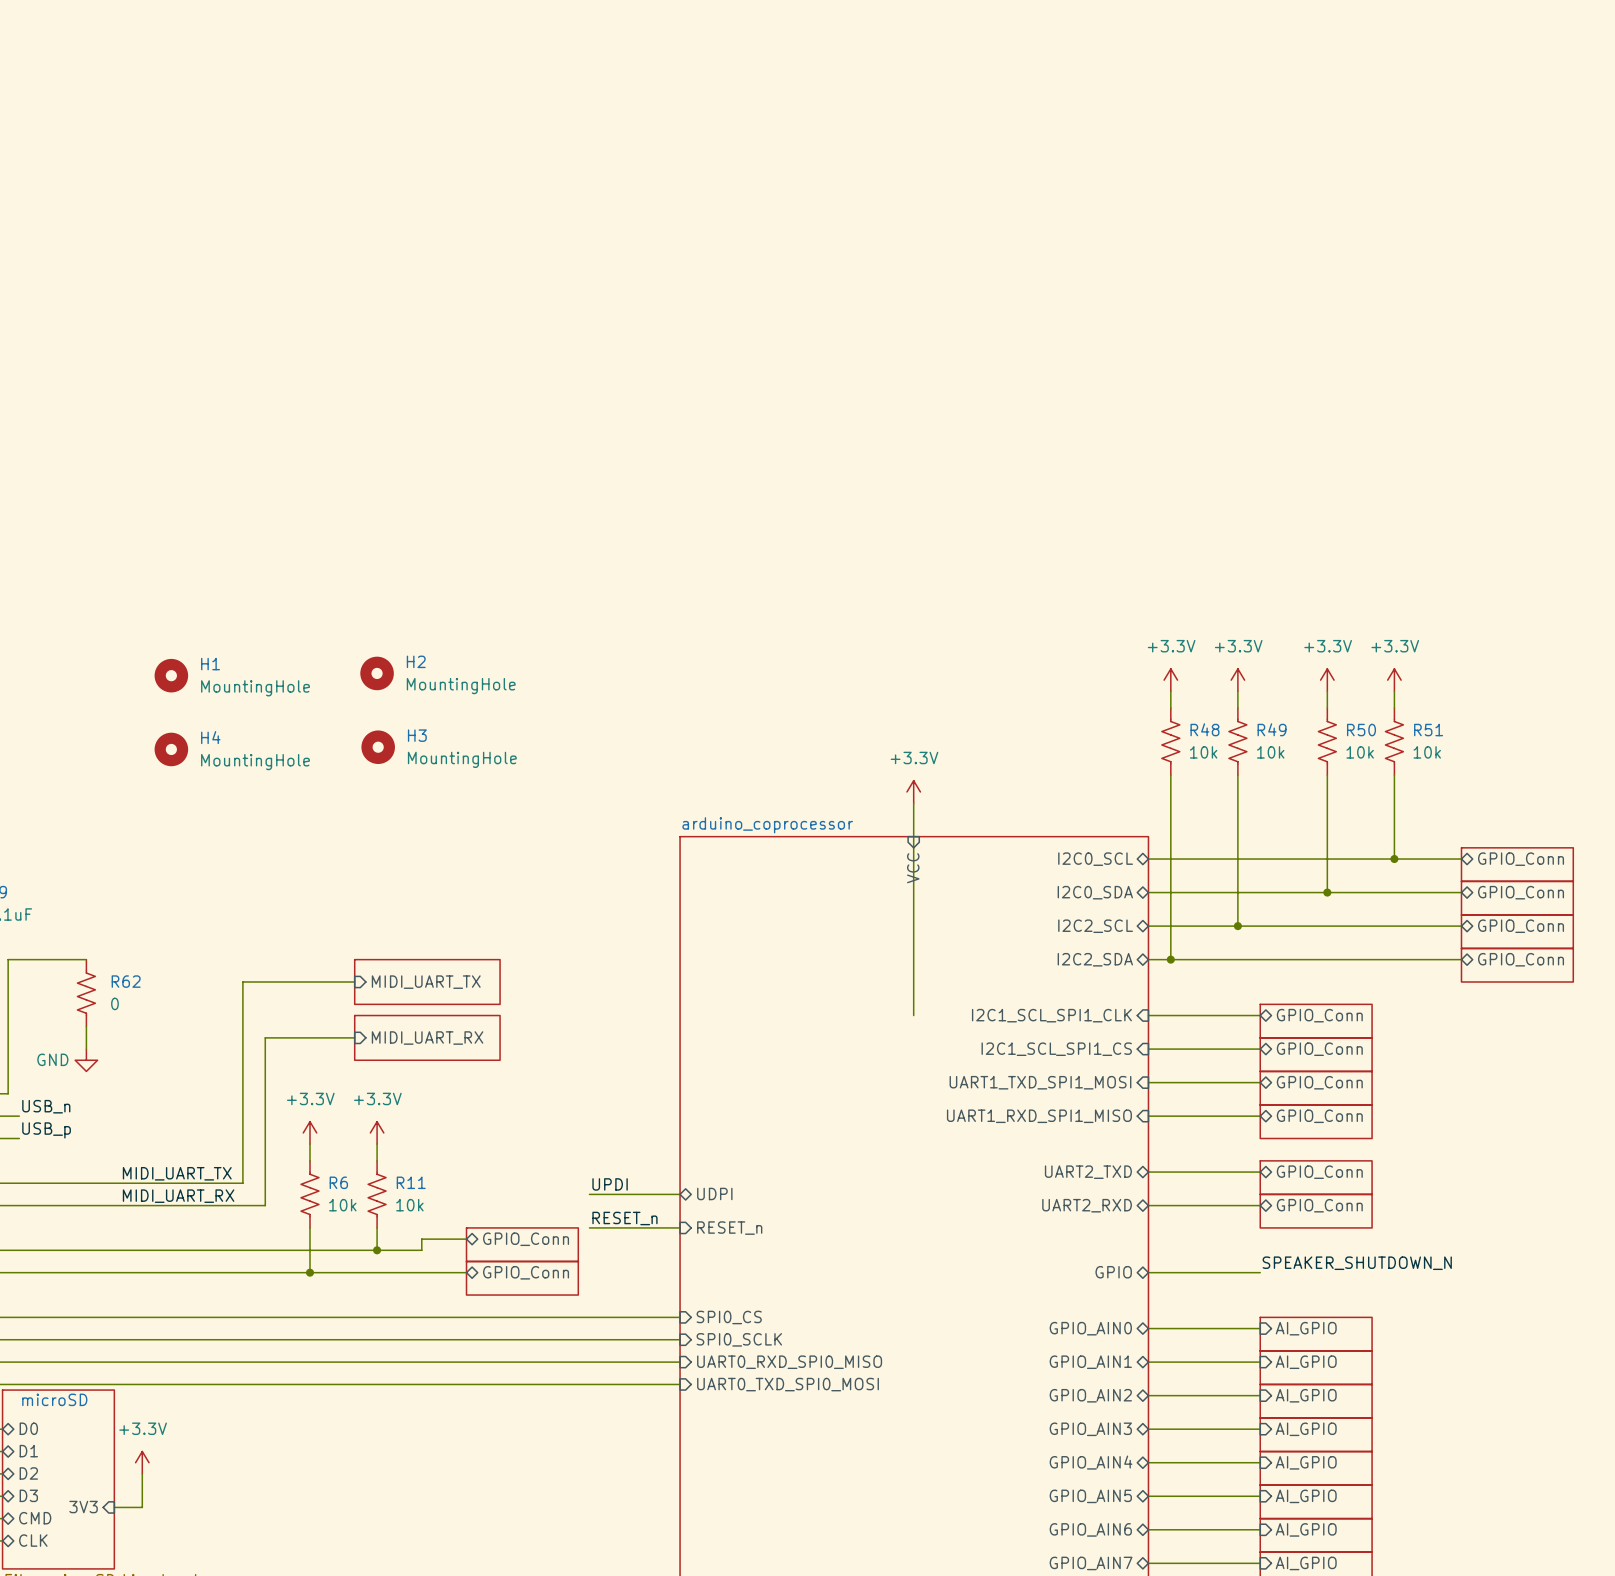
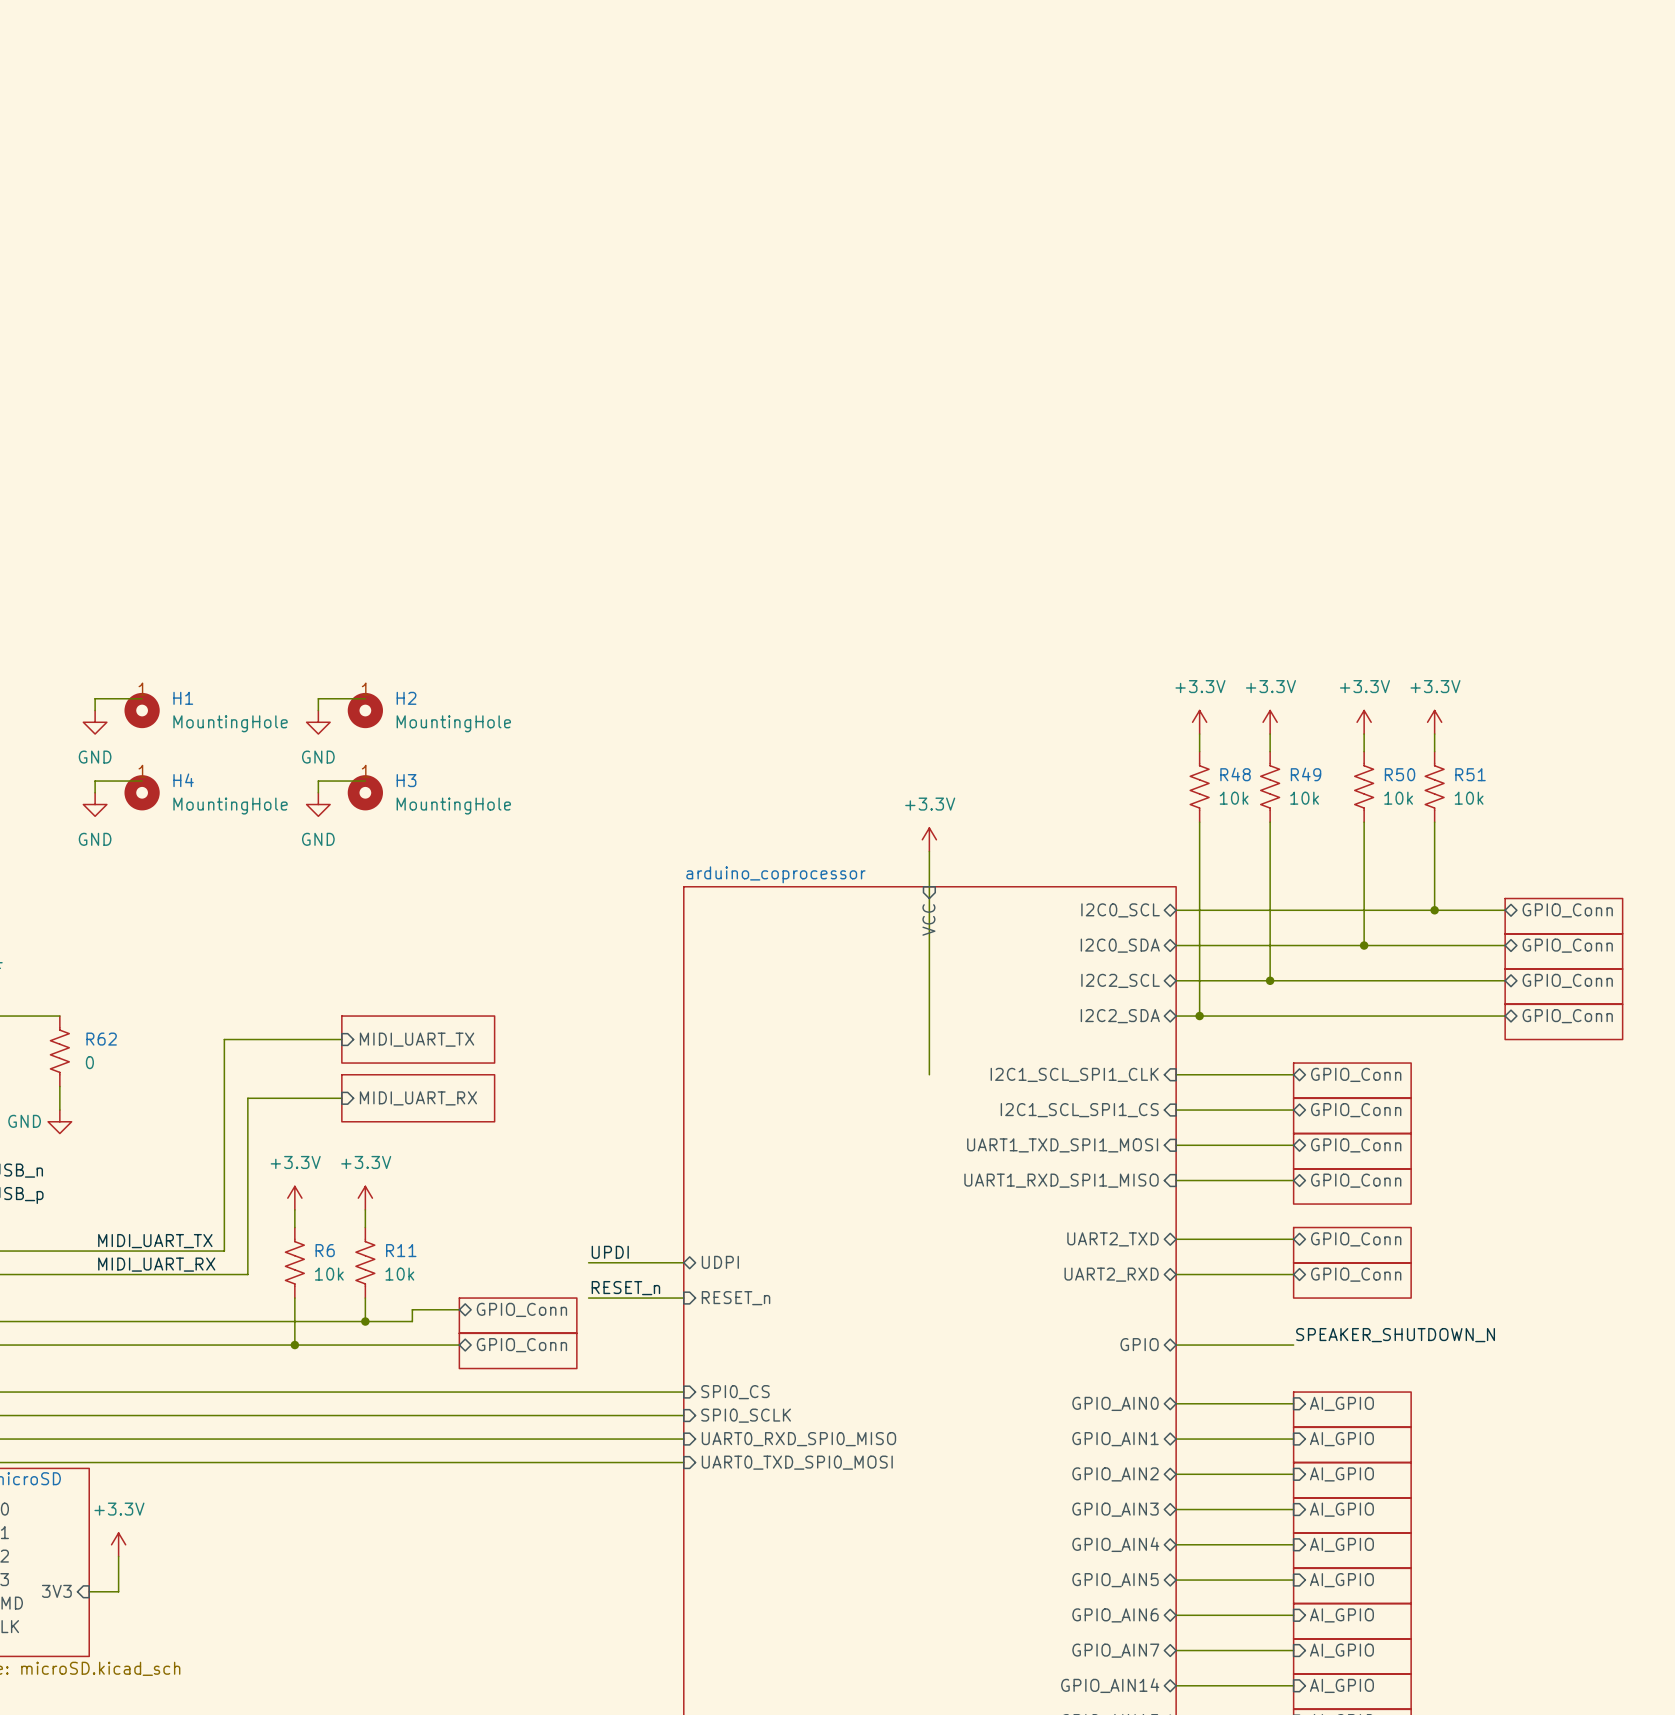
H2 symbol: [360, 656, 394, 691] -> [347, 692, 383, 729]
wire: none -> (142, 698) (95, 698) (95, 710)
wire: none -> (365, 698) (318, 698) (318, 710)
H1 symbol: [154, 658, 189, 693] -> [124, 692, 160, 729]
power symbol: none -> GND (95, 722)
power symbol: none -> GND (318, 722)
H3 symbol: [361, 730, 395, 764] -> [347, 775, 383, 811]
H4 symbol: [154, 732, 189, 767] -> [124, 775, 160, 811]
wire: none -> (142, 781) (95, 781) (95, 792)
wire: none -> (365, 781) (318, 781) (318, 792)
power symbol: none -> GND (95, 804)
power symbol: none -> GND (318, 804)

